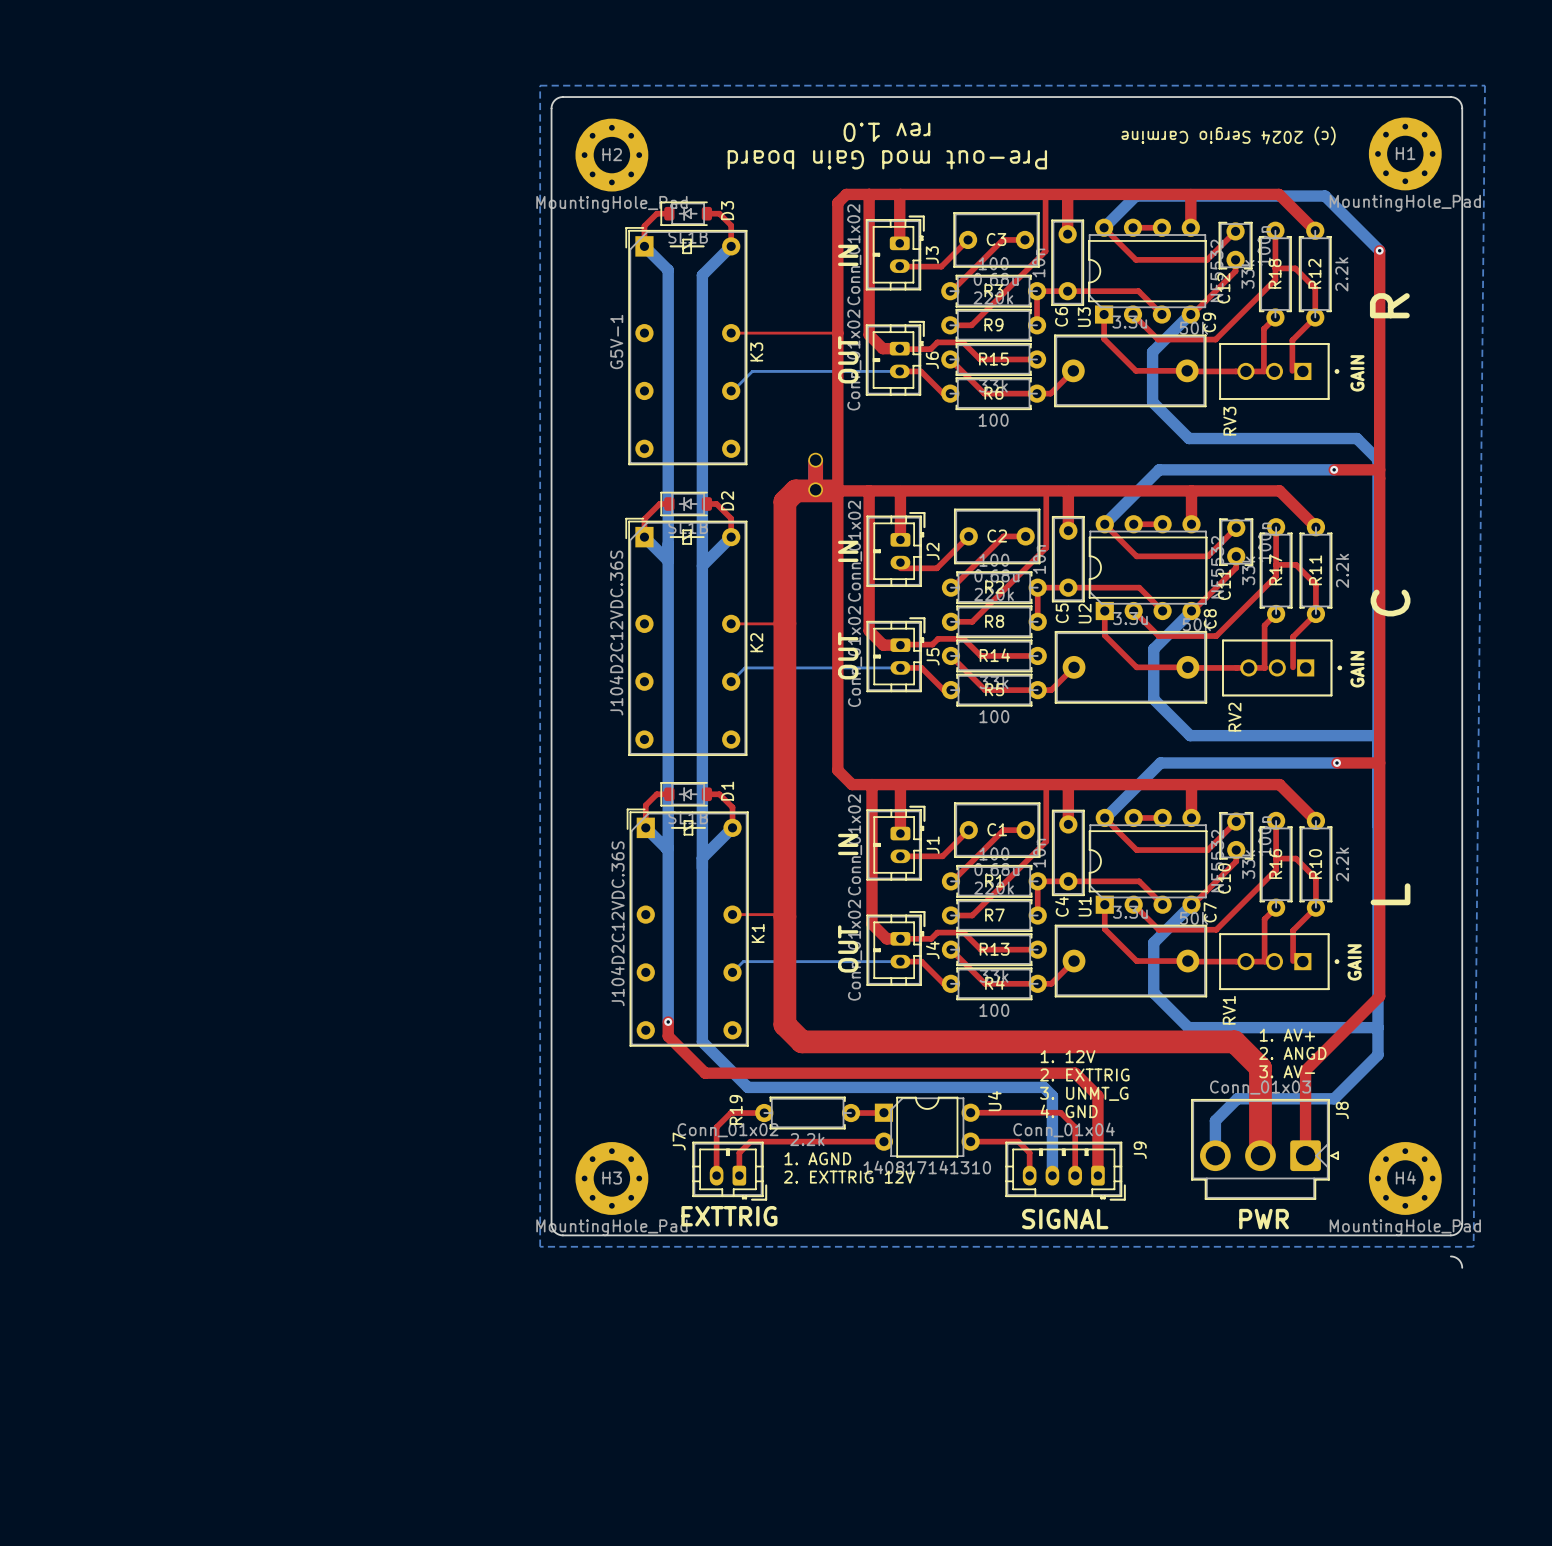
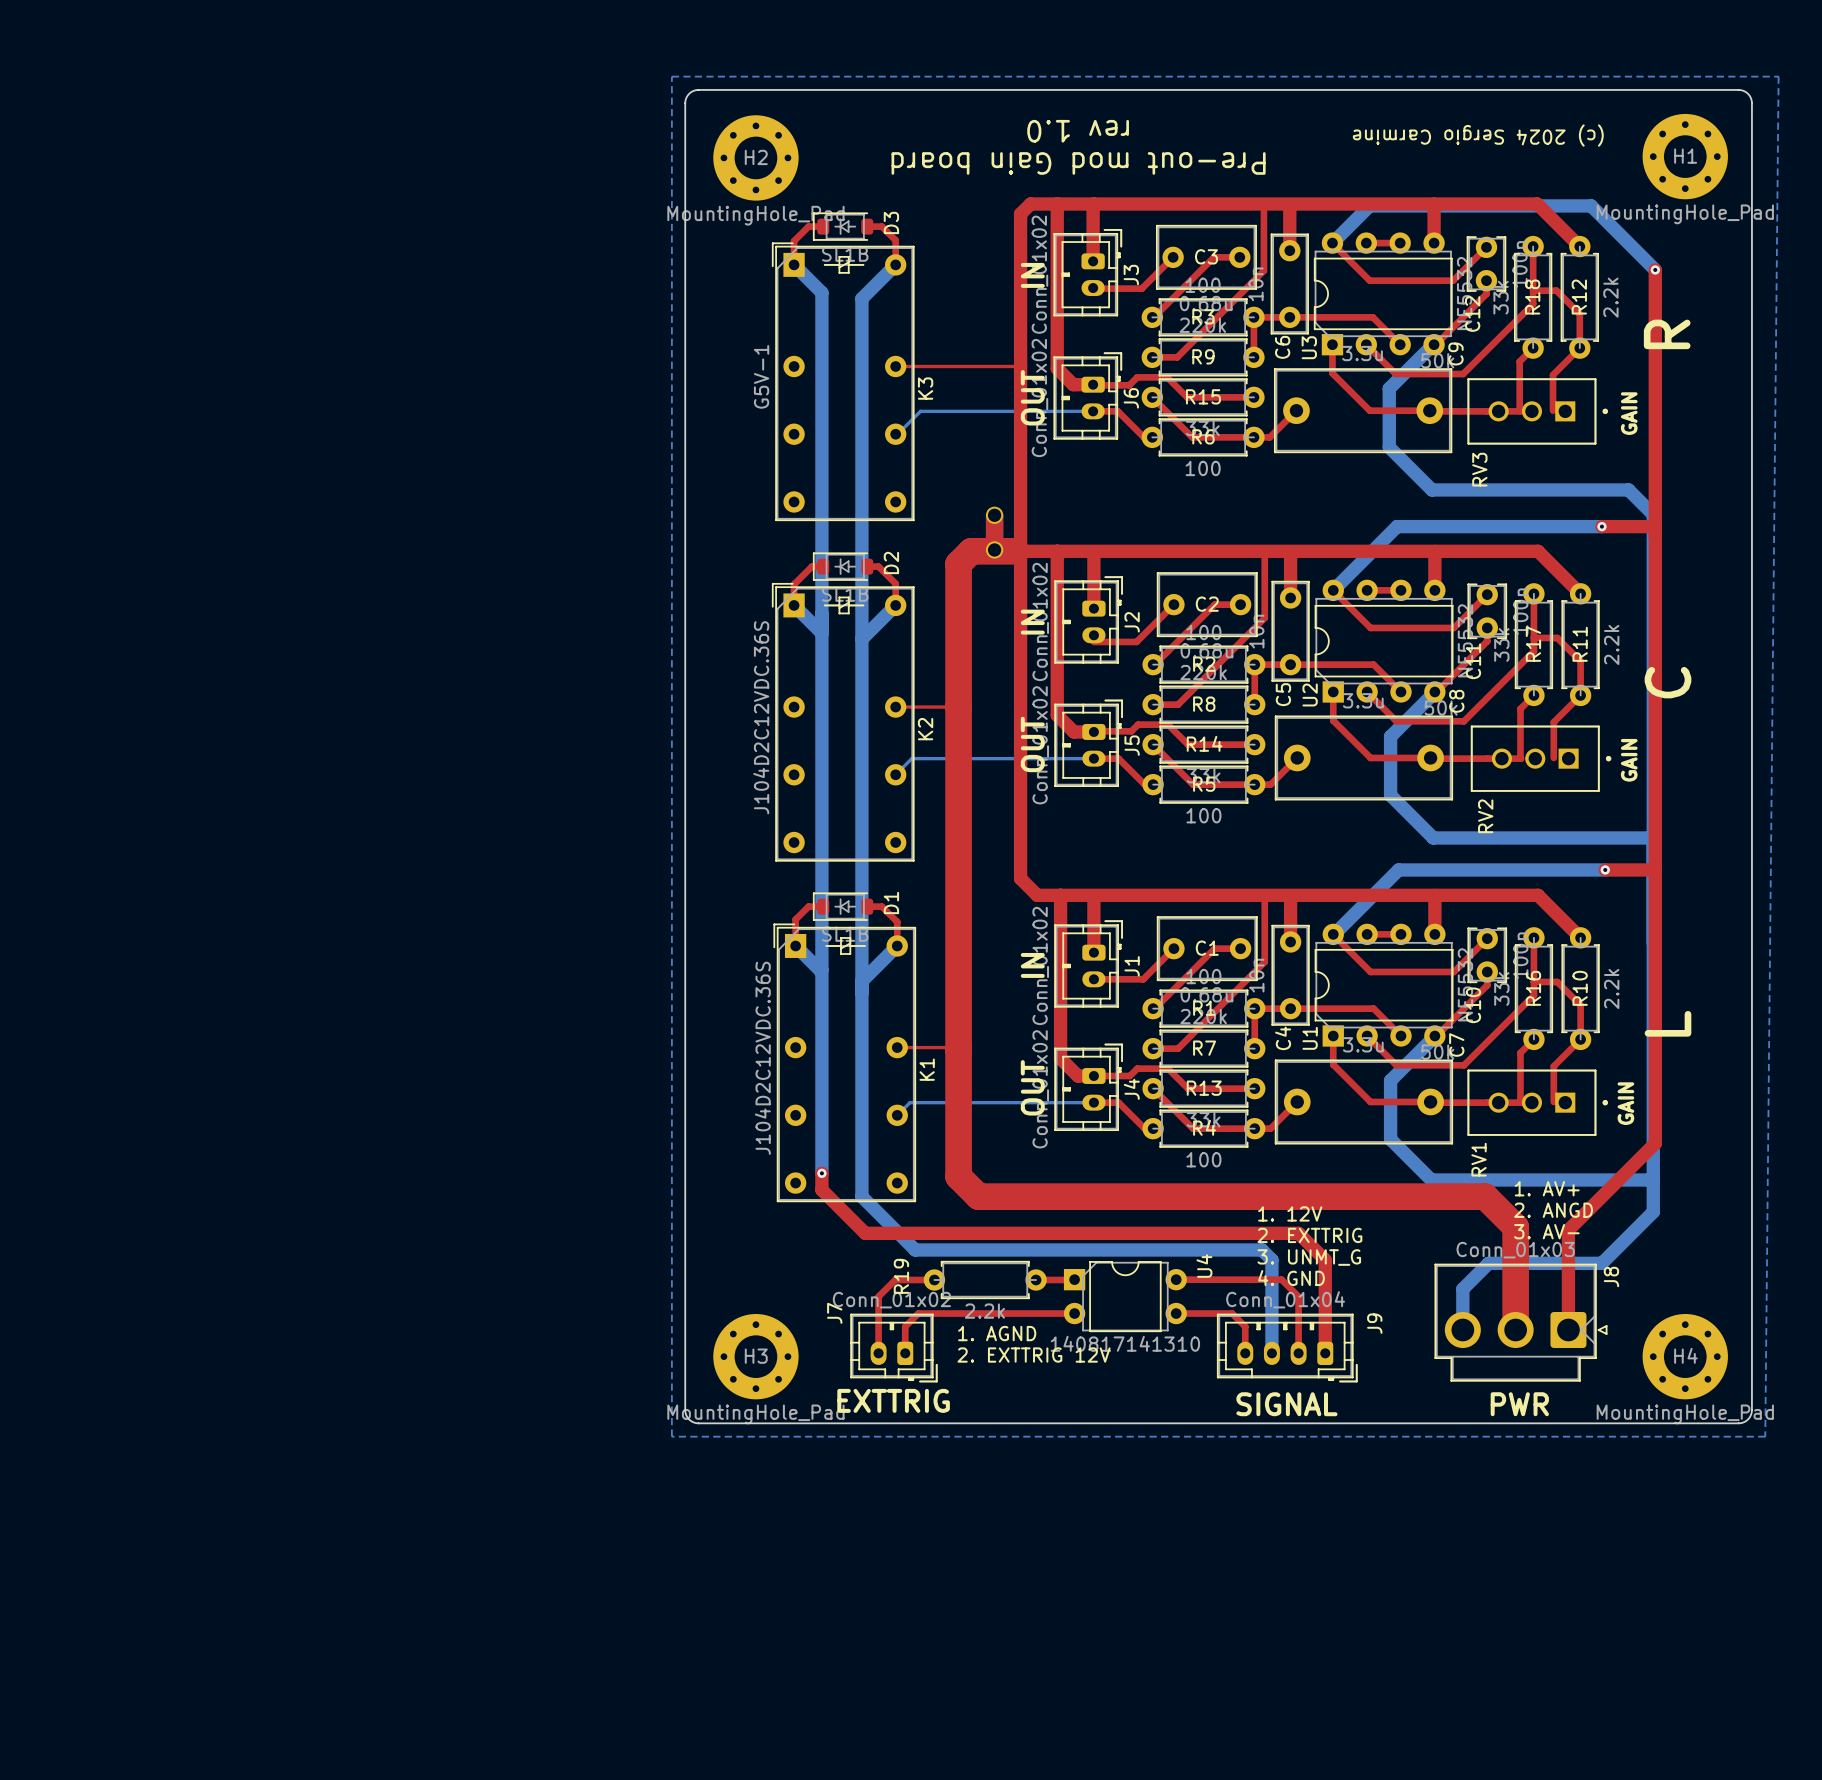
board edge: (1450, 1256) (1458, 1259) (1462, 1267) -> none

